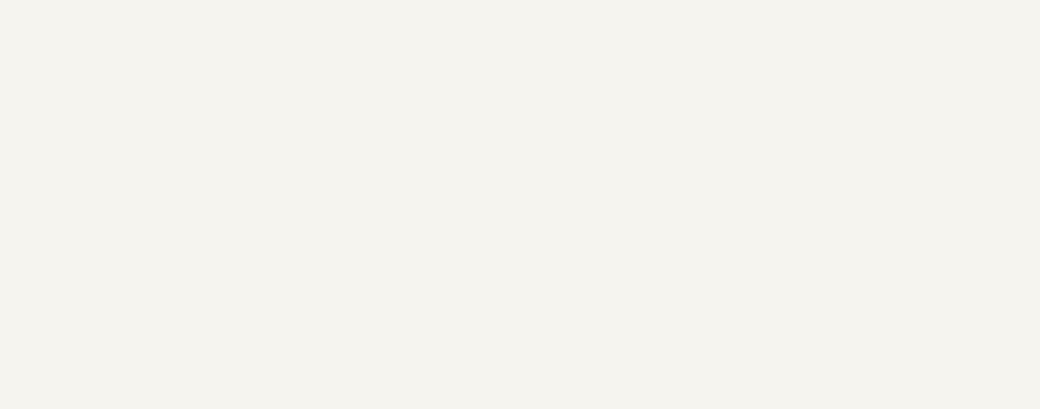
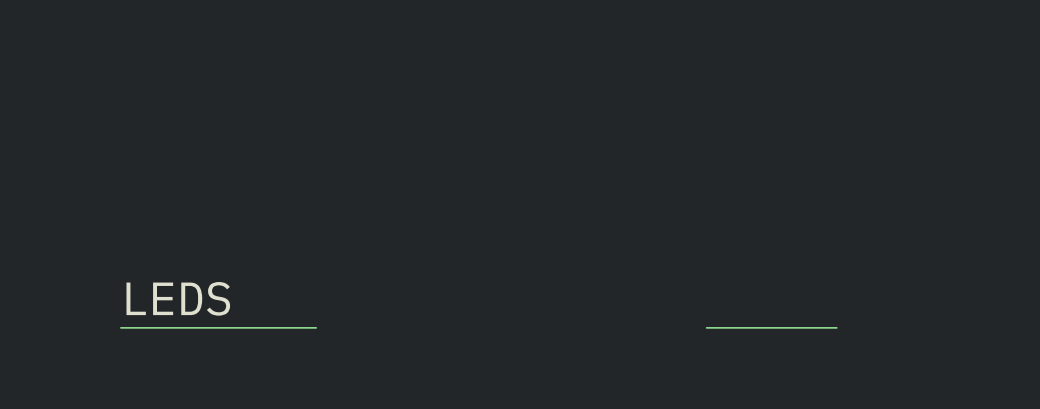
label: none -> LEDS (178, 298)
wire: none -> (120, 327) (316, 327)
wire: none -> (706, 327) (836, 327)

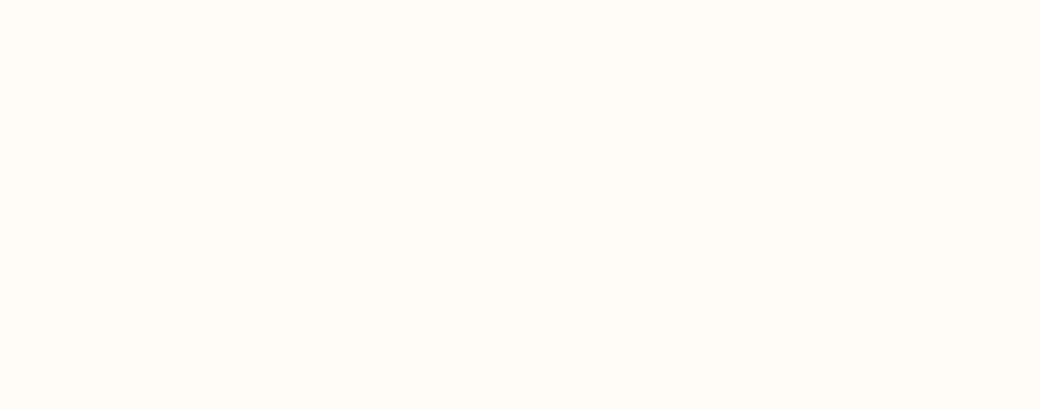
label: LEDS (178, 298) -> none
wire: (120, 327) (316, 327) -> none
wire: (706, 327) (836, 327) -> none

